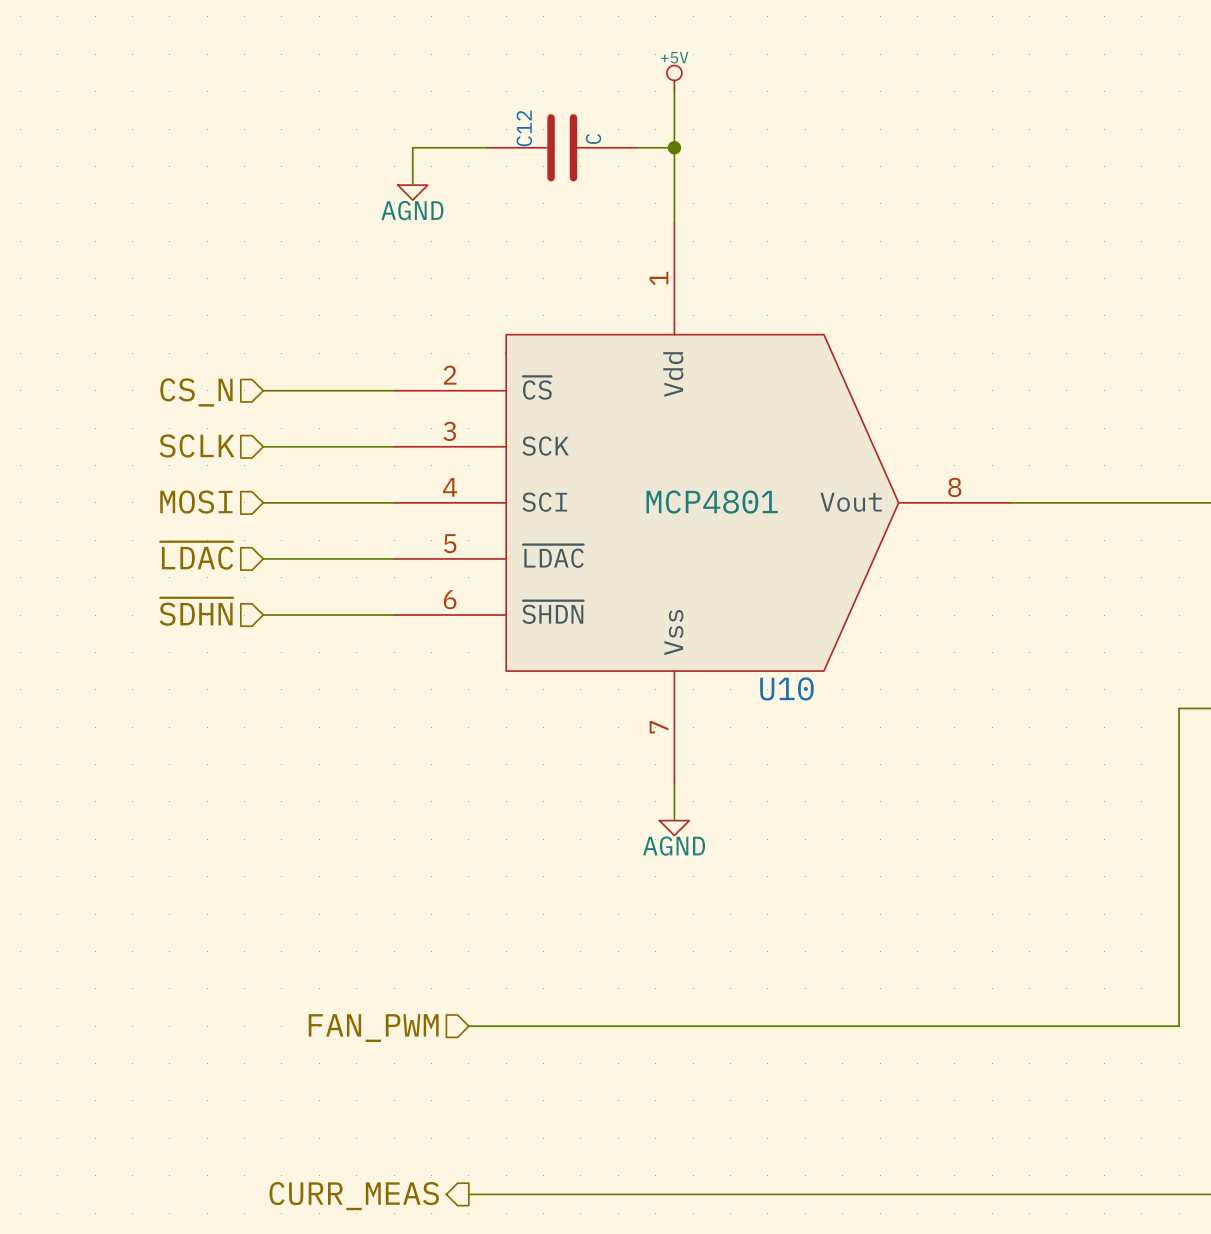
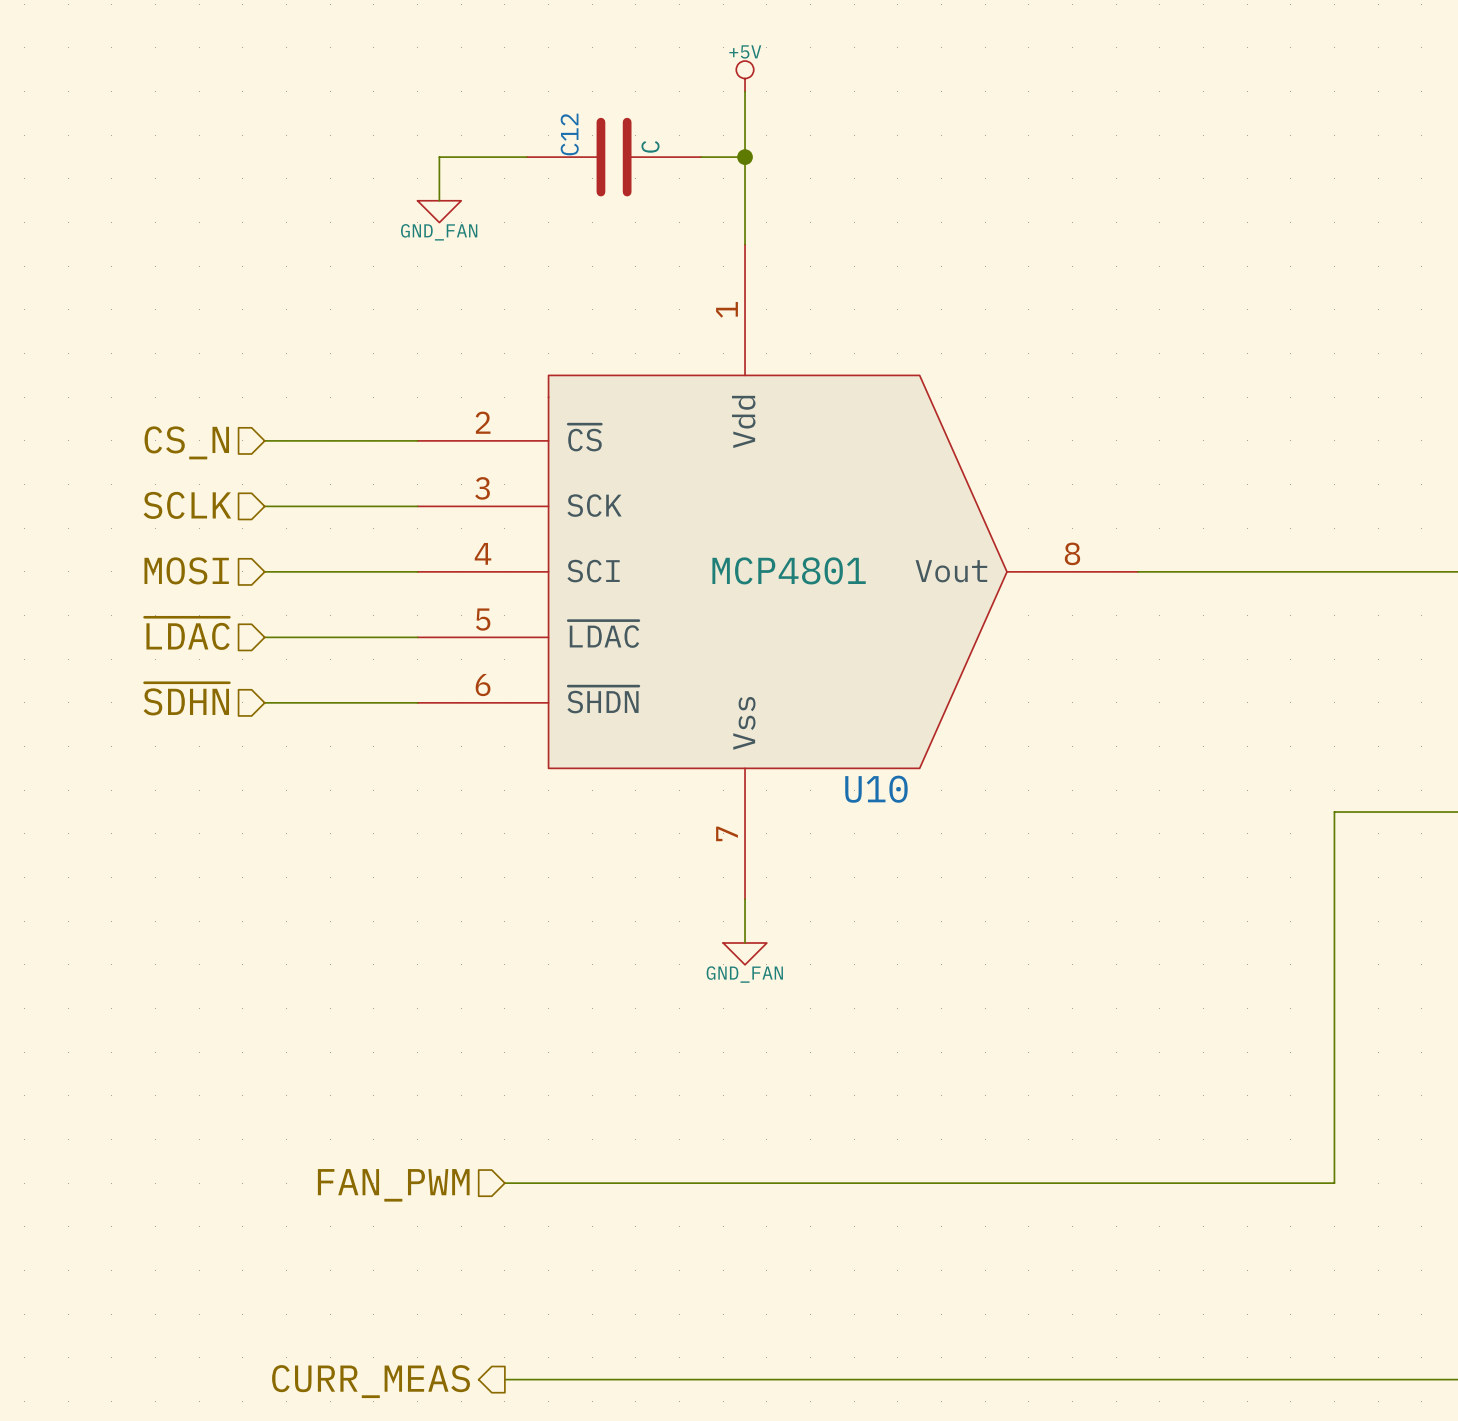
power symbol: AGND (412, 192) -> GND_FAN (439, 211)
power symbol: AGND (674, 828) -> GND_FAN (745, 953)

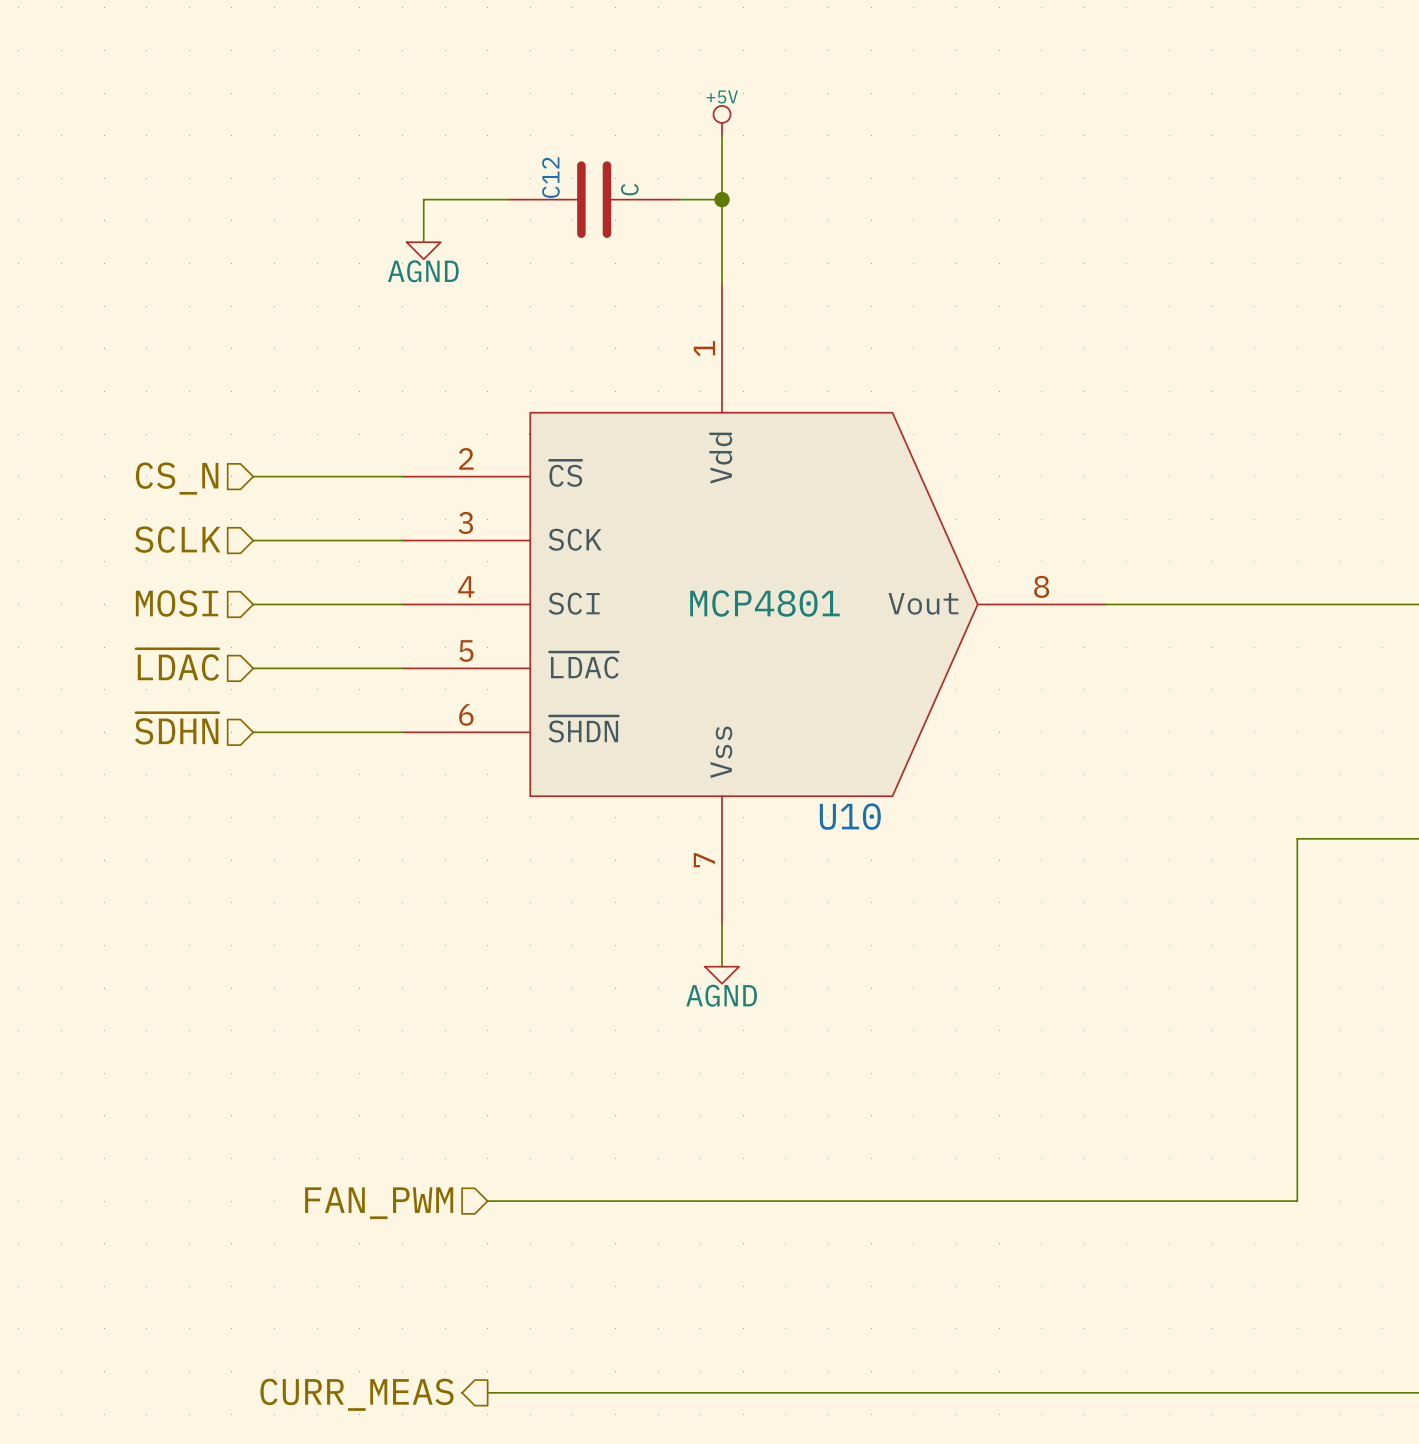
power symbol: GND_FAN (439, 211) -> AGND (423, 250)
power symbol: GND_FAN (745, 953) -> AGND (722, 975)

